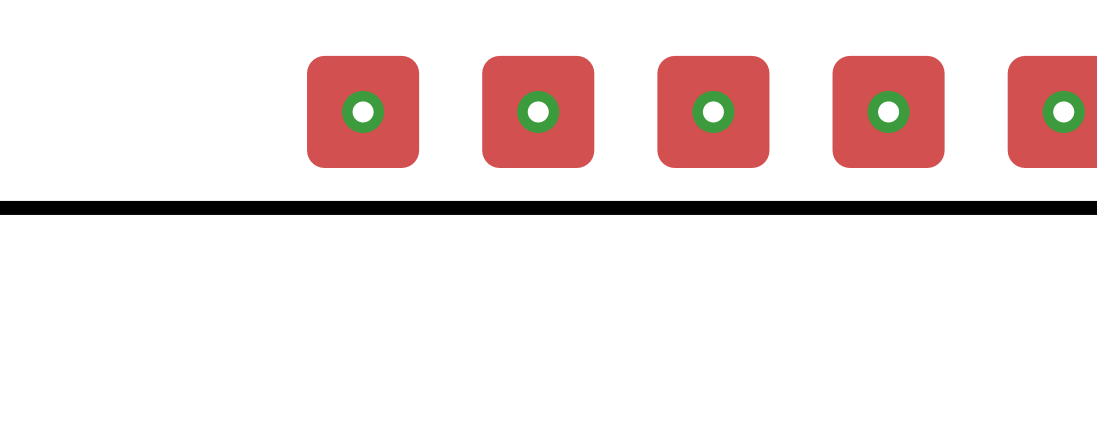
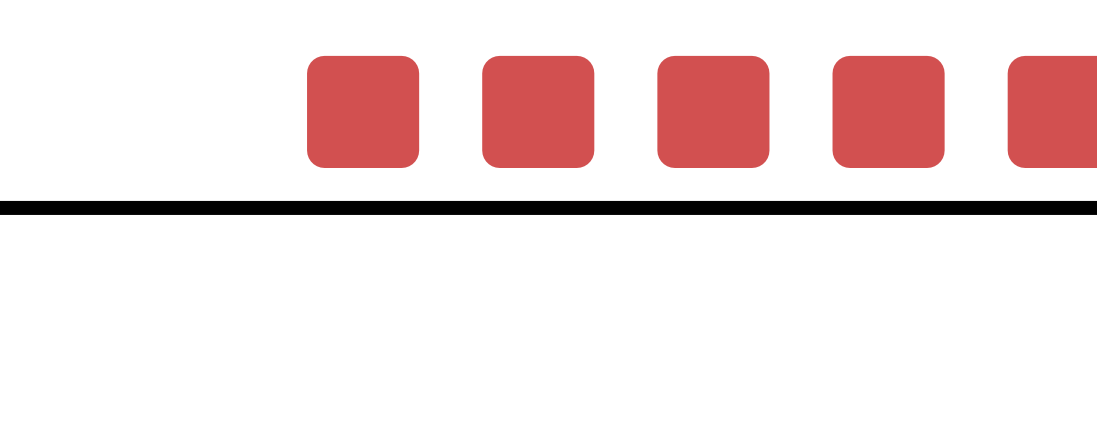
via: (363, 111) -> none
via: (538, 111) -> none
via: (713, 111) -> none
via: (888, 111) -> none
via: (1063, 111) -> none

